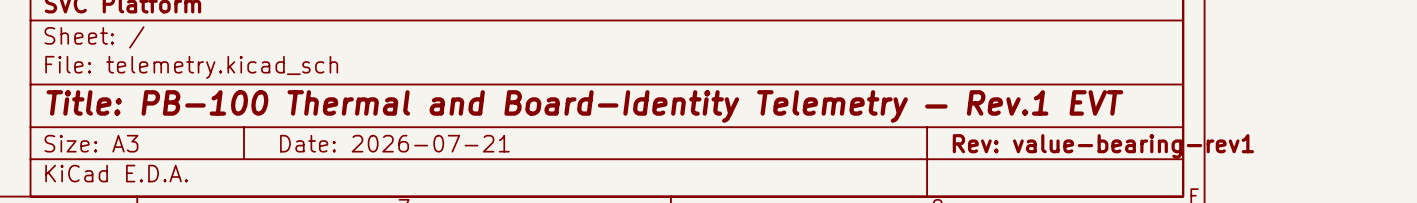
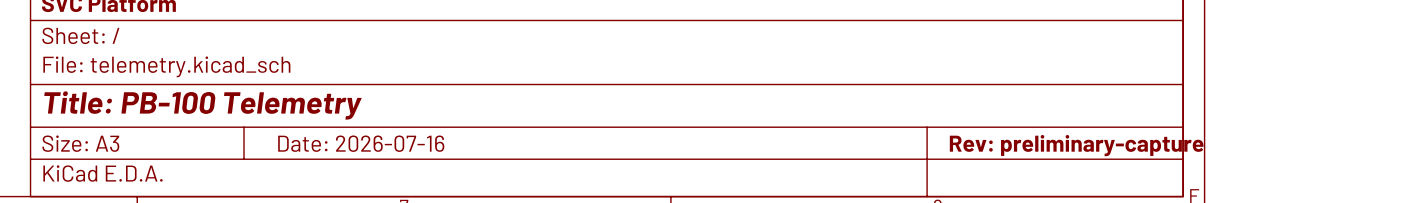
title block: Title: PB-100 Thermal and Board-Identity Telemetry — Rev.1 EVT (584, 106) -> Title: PB-100 Telemetry (203, 105)
title block: Date: 2026-07-21 (394, 143) -> Date: 2026-07-16 (361, 143)
title block: Rev: value-bearing-rev1 (1103, 146) -> Rev: preliminary-capture (1076, 145)

